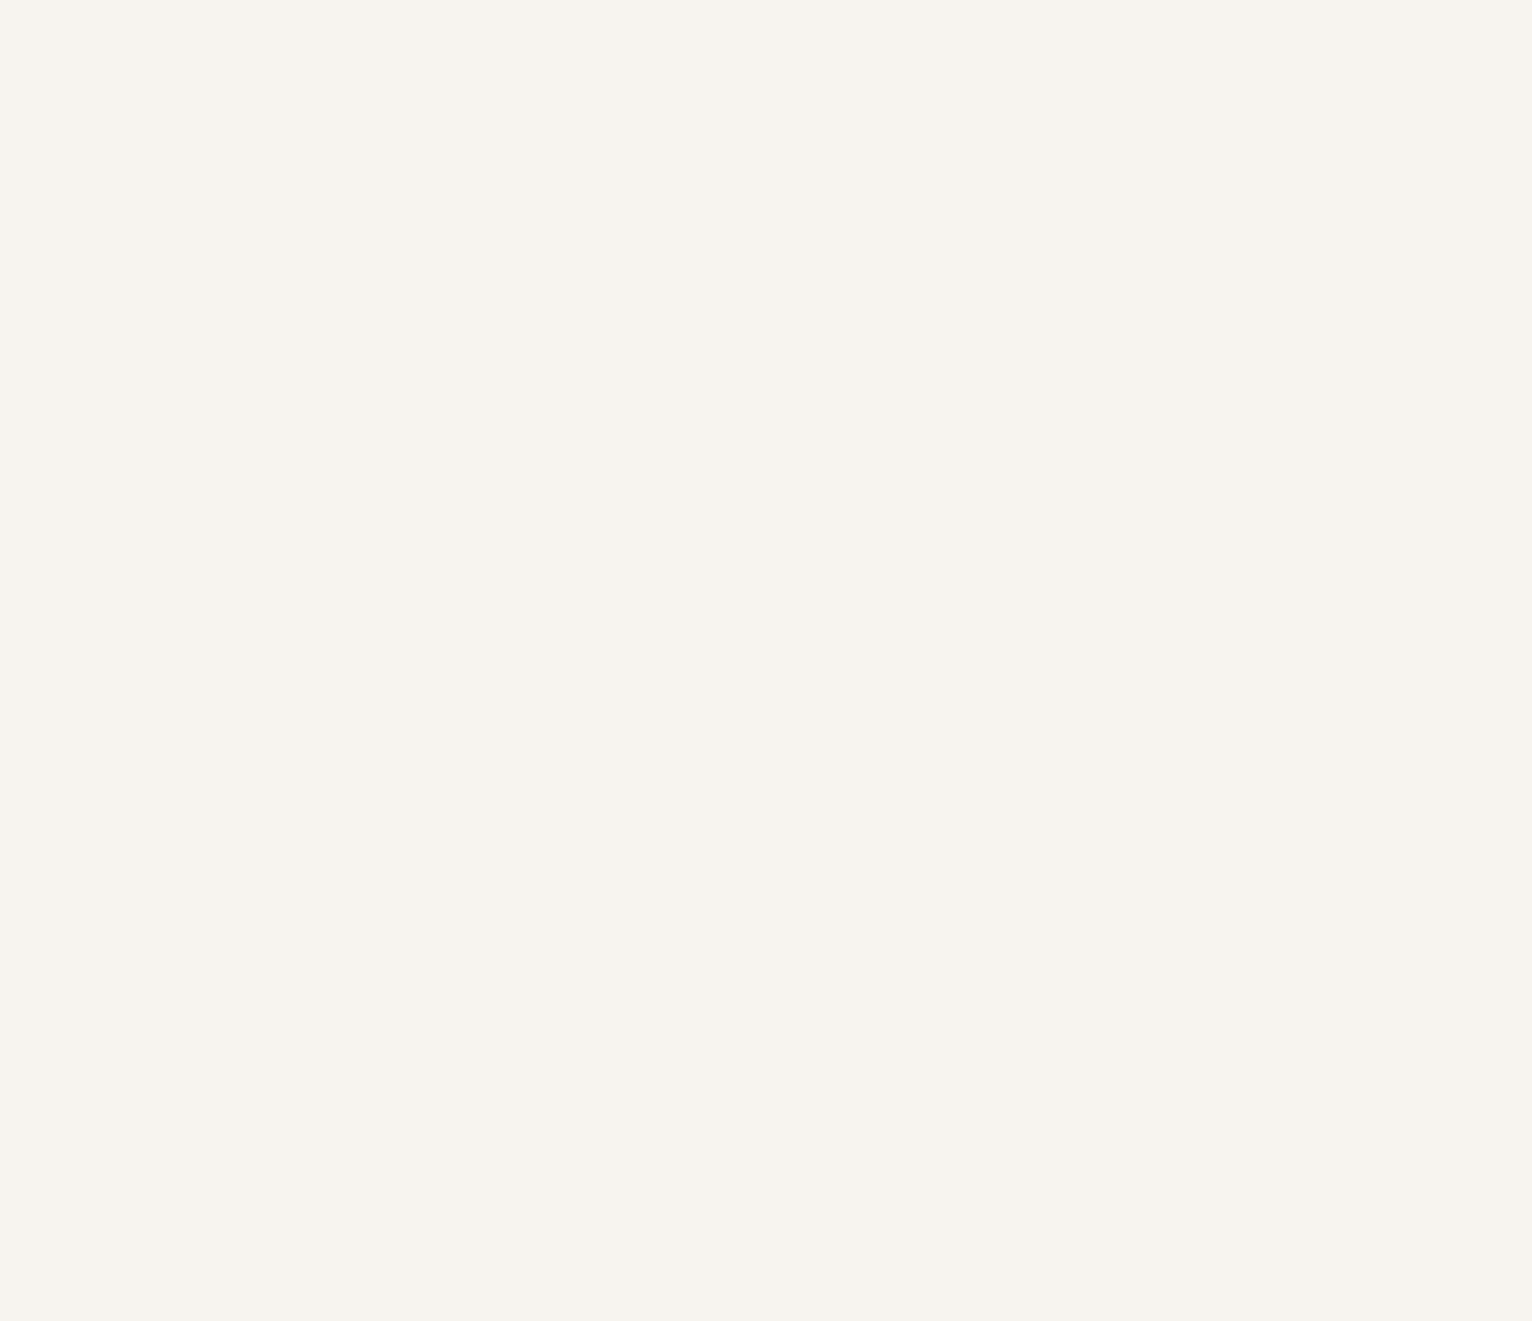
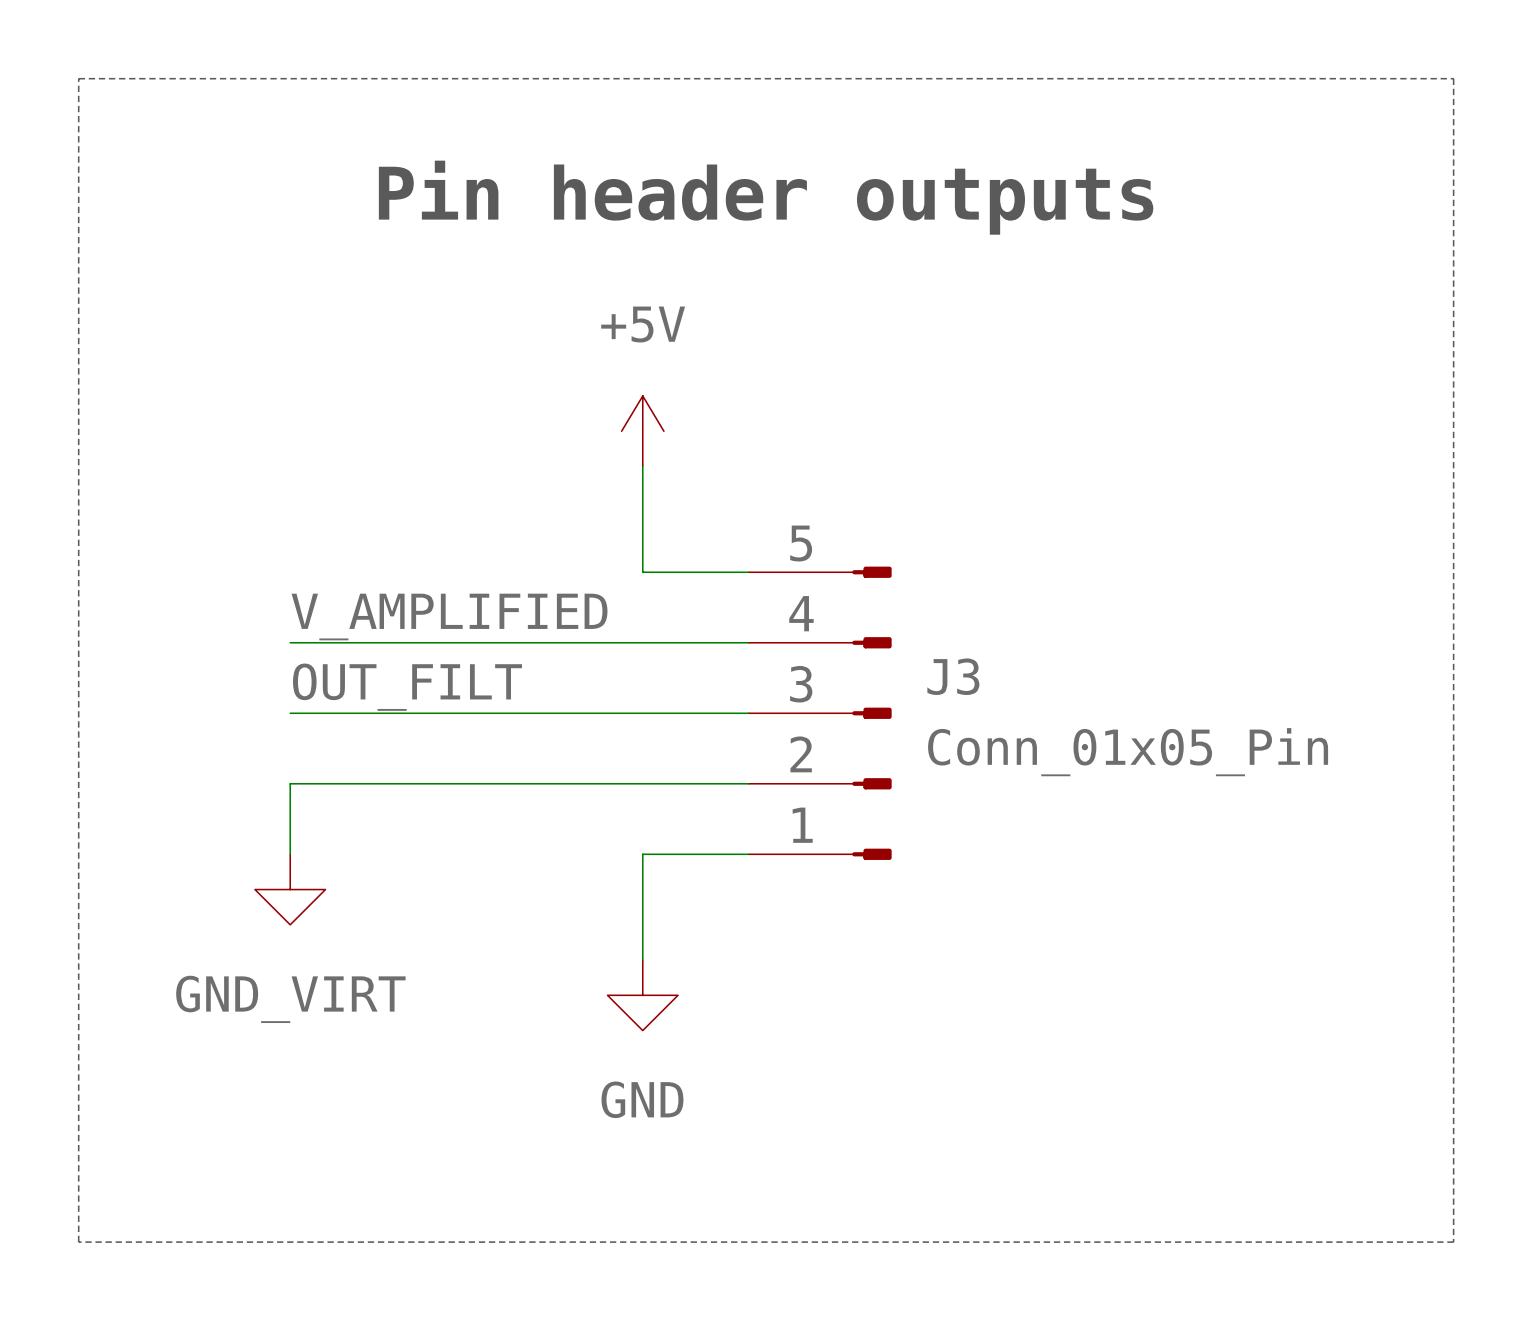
line: none -> (78, 78) (1453, 78) (1453, 1242) (78, 1242) (78, 78)
text: none -> Pin header outputs (766, 197)
power symbol: none -> +5V (642, 431)
wire: none -> (642, 466) (642, 572) (748, 572)
label: none -> V_AMPLIFIED (449, 617)
wire: none -> (290, 642) (748, 642)
label: none -> OUT_FILT (407, 687)
wire: none -> (290, 713) (748, 713)
J3: none -> Conn_01x05_Pin (820, 713)
wire: none -> (748, 783) (290, 783) (290, 854)
wire: none -> (748, 854) (642, 854) (642, 960)
power symbol: none -> GND_VIRT (290, 889)
power symbol: none -> GND (642, 995)

